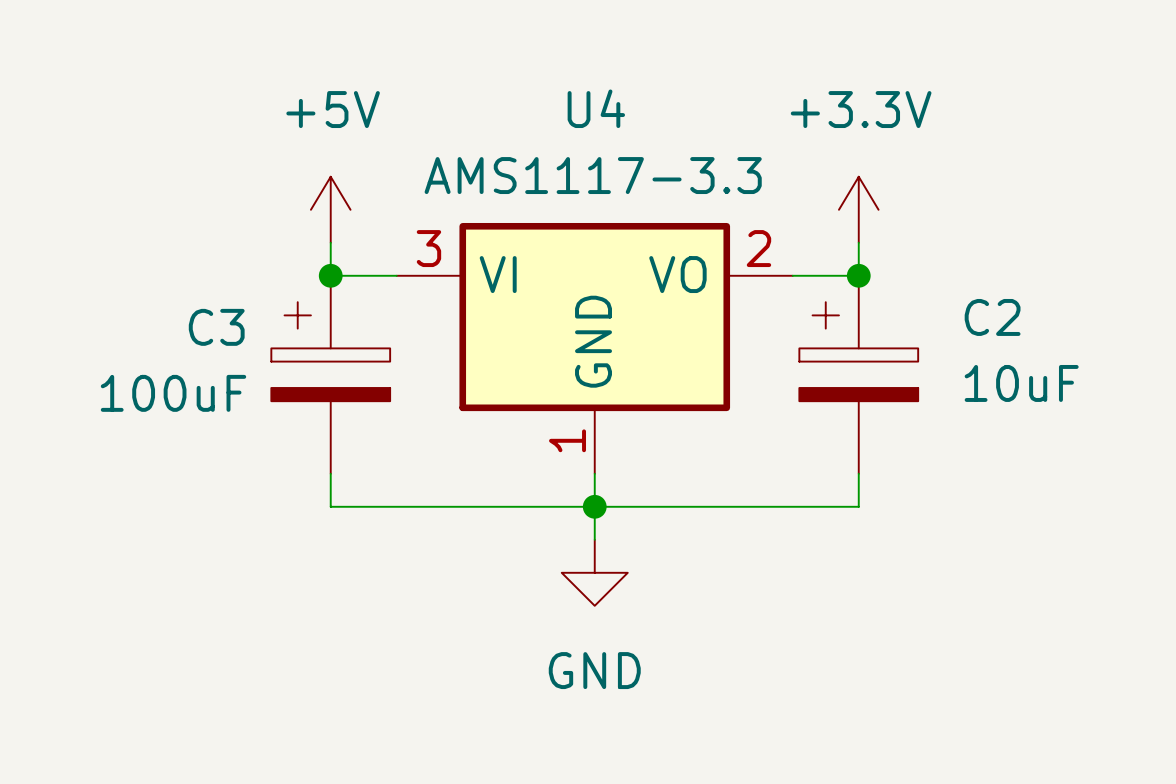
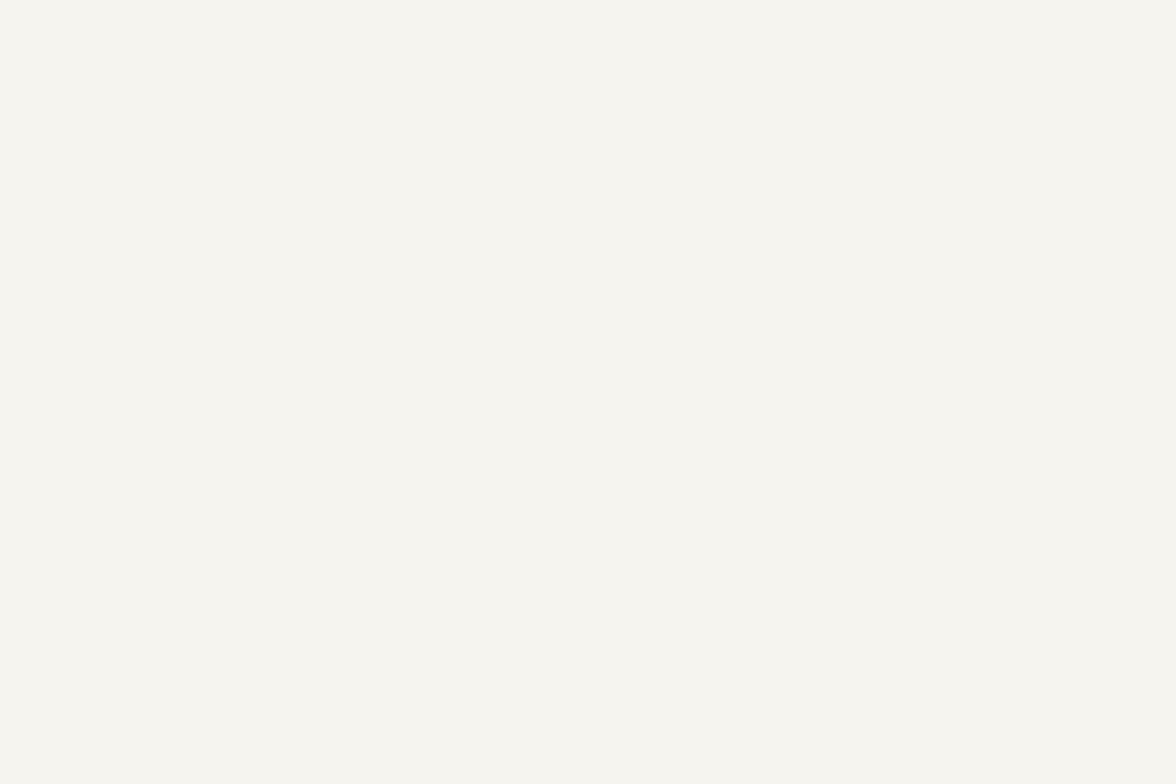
power symbol: +5V (330, 209) -> none
power symbol: +3.3V (858, 209) -> none
wire: (330, 242) (330, 275) (396, 275) -> none
wire: (858, 242) (858, 275) (792, 275) -> none
junction: (330, 275) -> none
junction: (858, 275) -> none
U4: AMS1117-3.3 (594, 348) -> none
C3: 100uF (330, 374) -> none
C2: 10uF (858, 374) -> none
wire: (330, 473) (330, 506) (858, 506) (858, 473) -> none
wire: (594, 473) (594, 539) -> none
junction: (594, 506) -> none
power symbol: GND (594, 572) -> none

